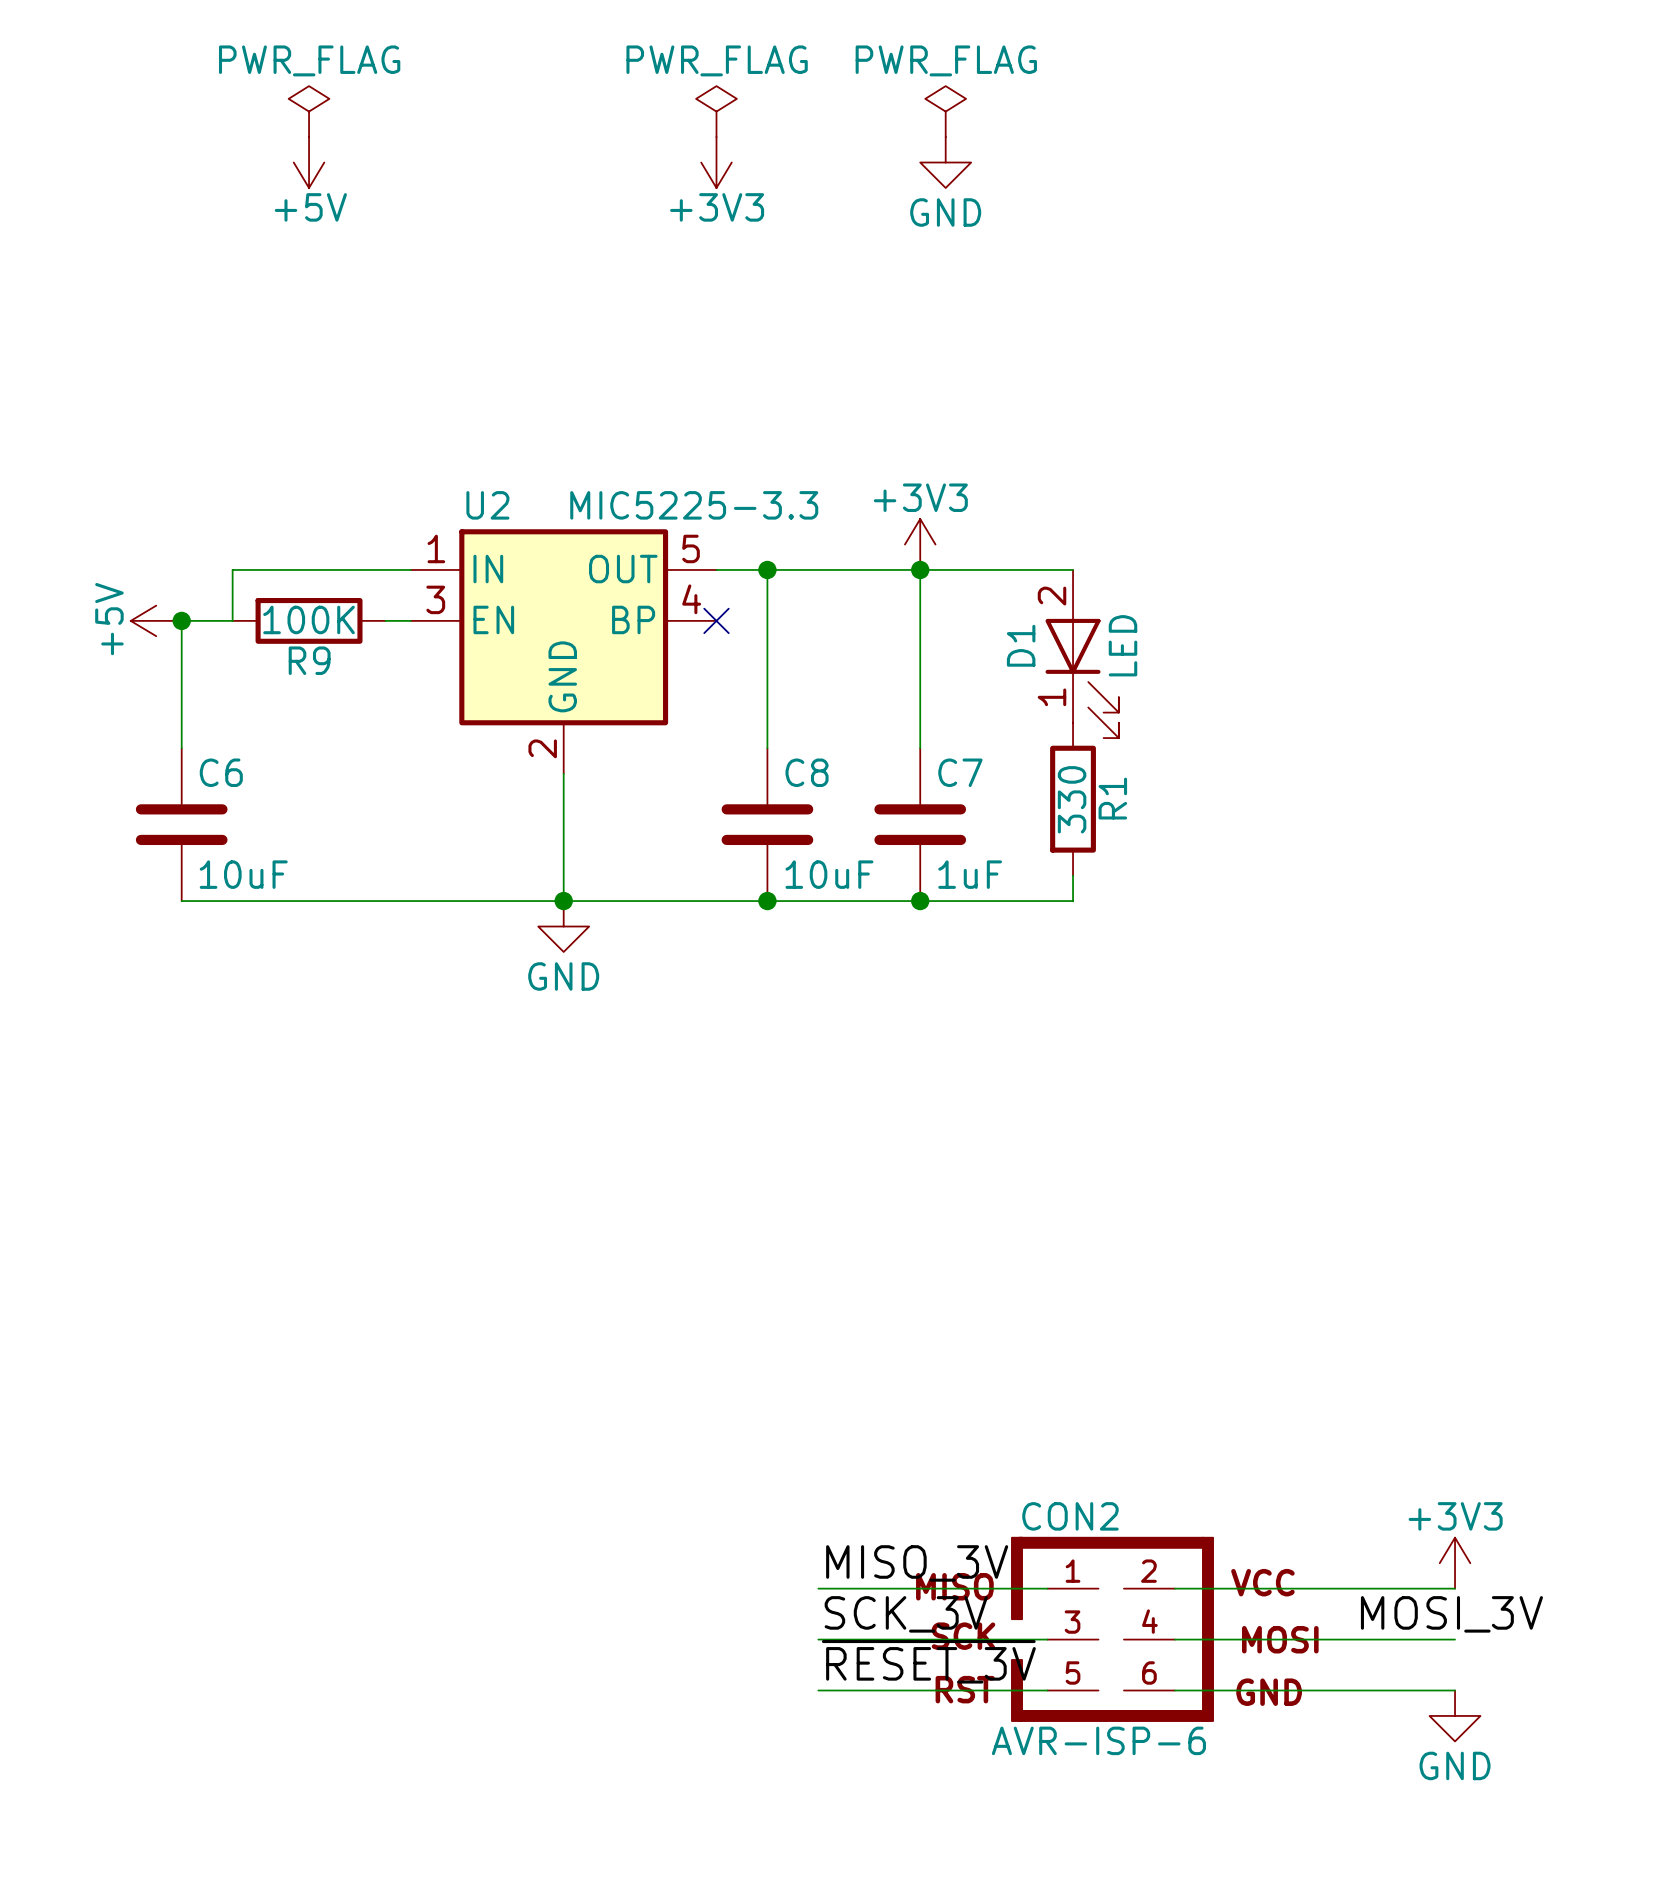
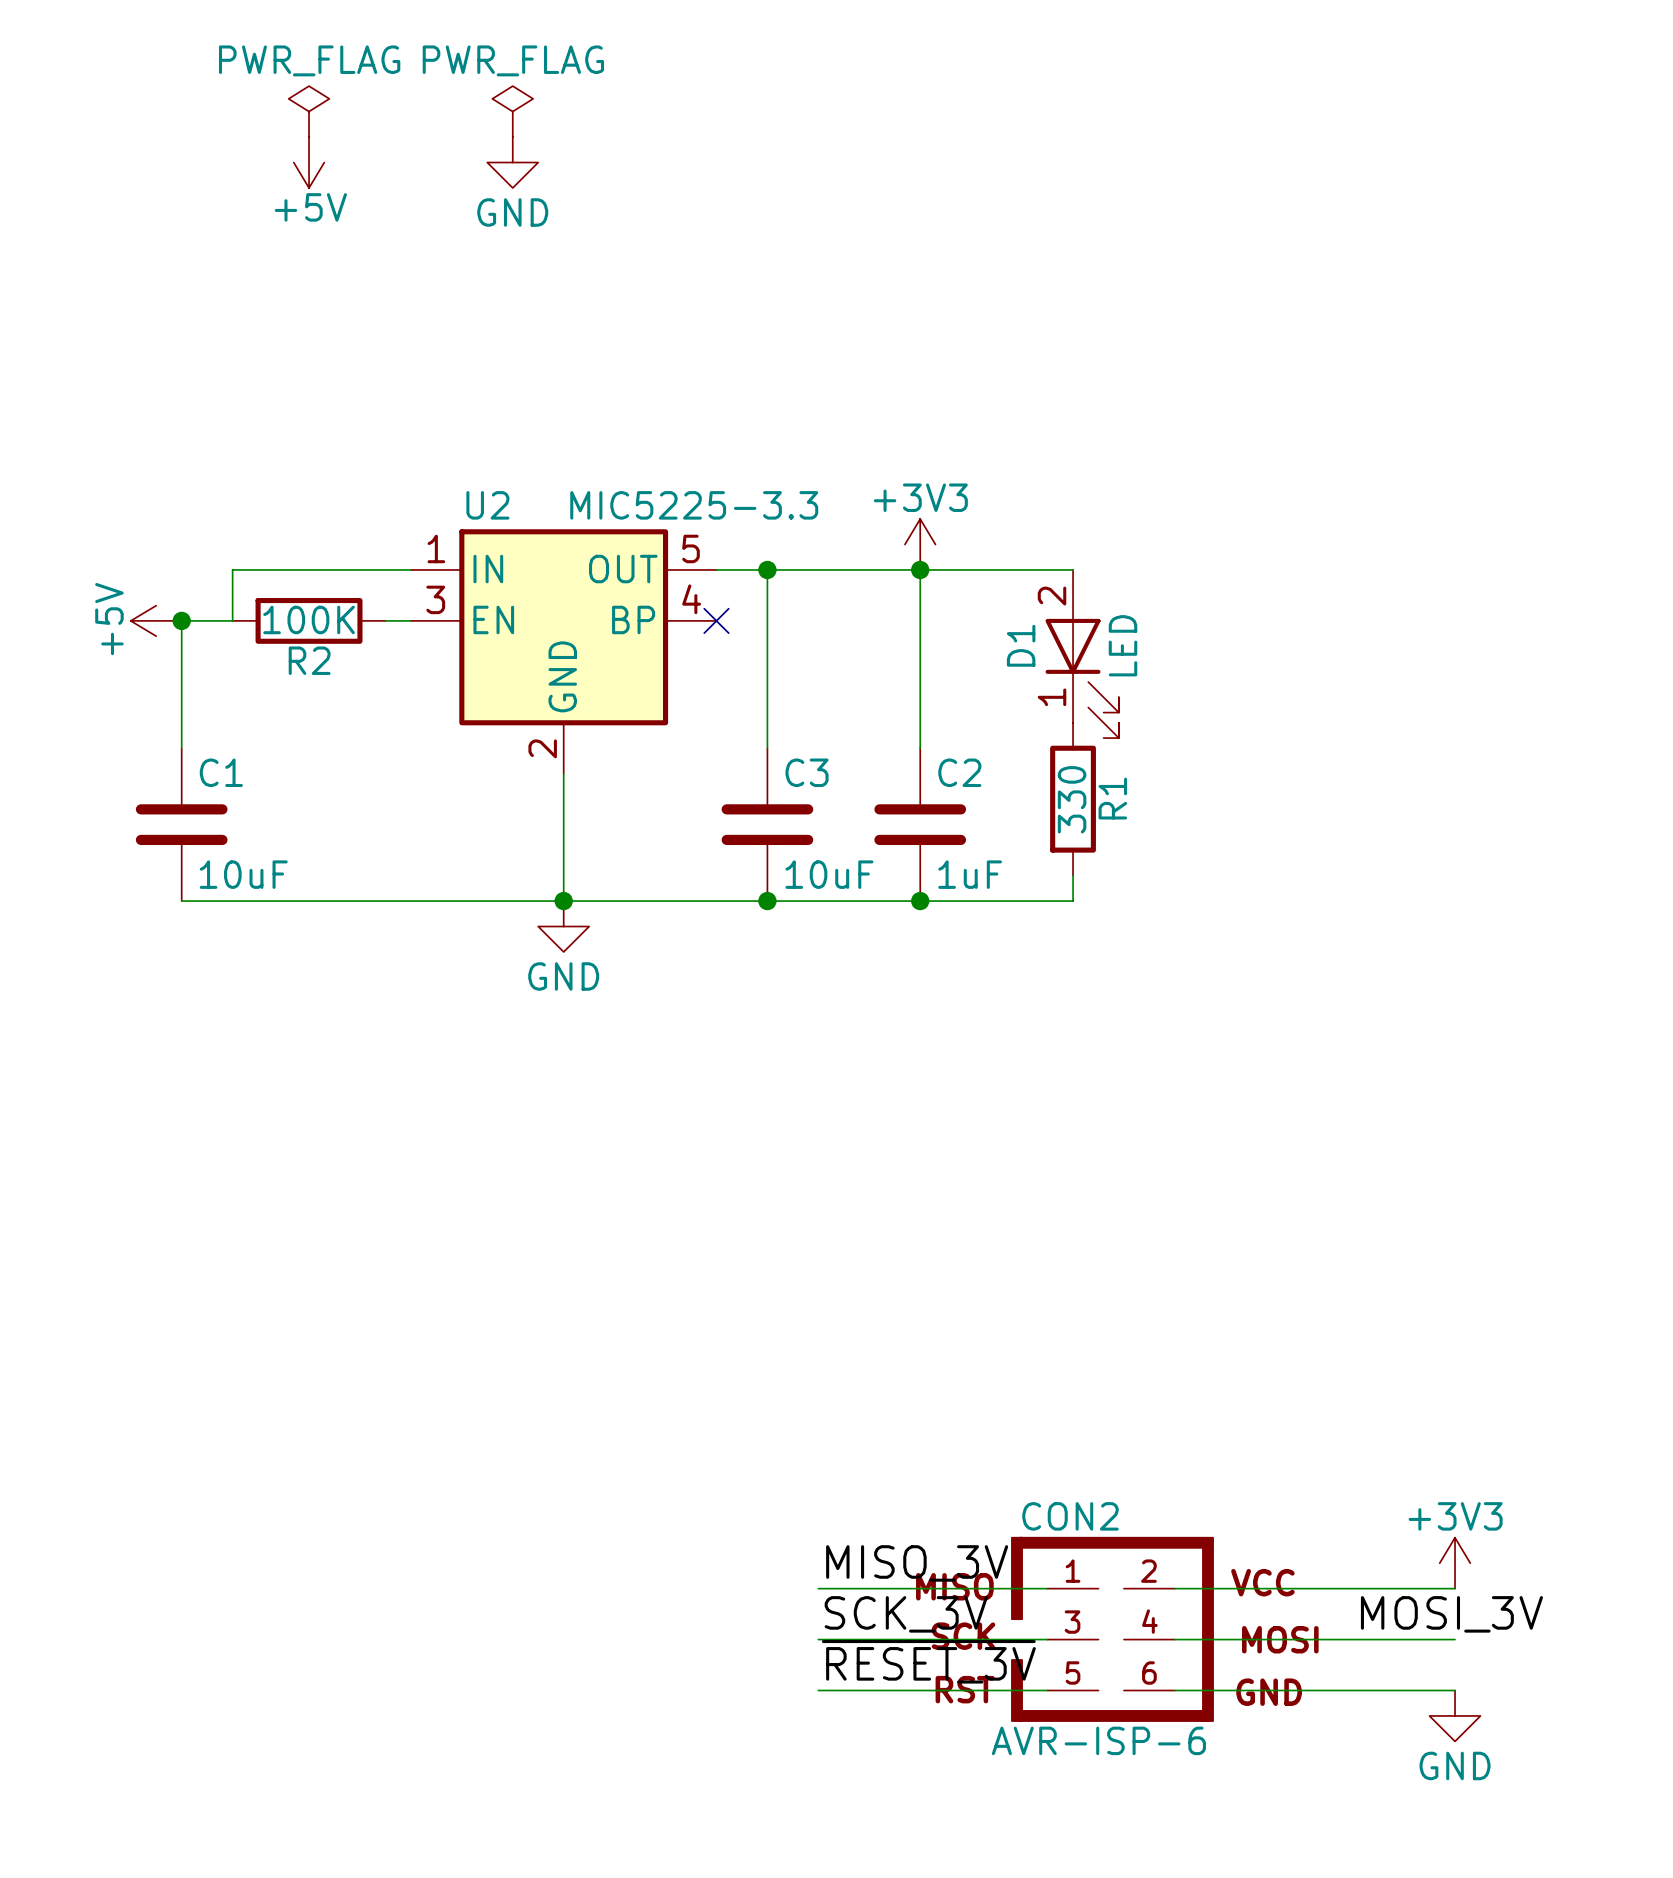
power symbol position: PWR_FLAG (716, 111) -> PWR_FLAG (512, 111)
power symbol: PWR_FLAG (945, 111) -> none
power symbol: +3V3 (716, 162) -> none
power symbol position: GND (945, 162) -> GND (512, 162)
R9 name: R9 (309, 660) -> R2 (309, 660)
C6 name: C6 (221, 772) -> C1 (221, 772)
C8 name: C8 (807, 772) -> C3 (807, 772)
C7 name: C7 (960, 772) -> C2 (959, 772)

